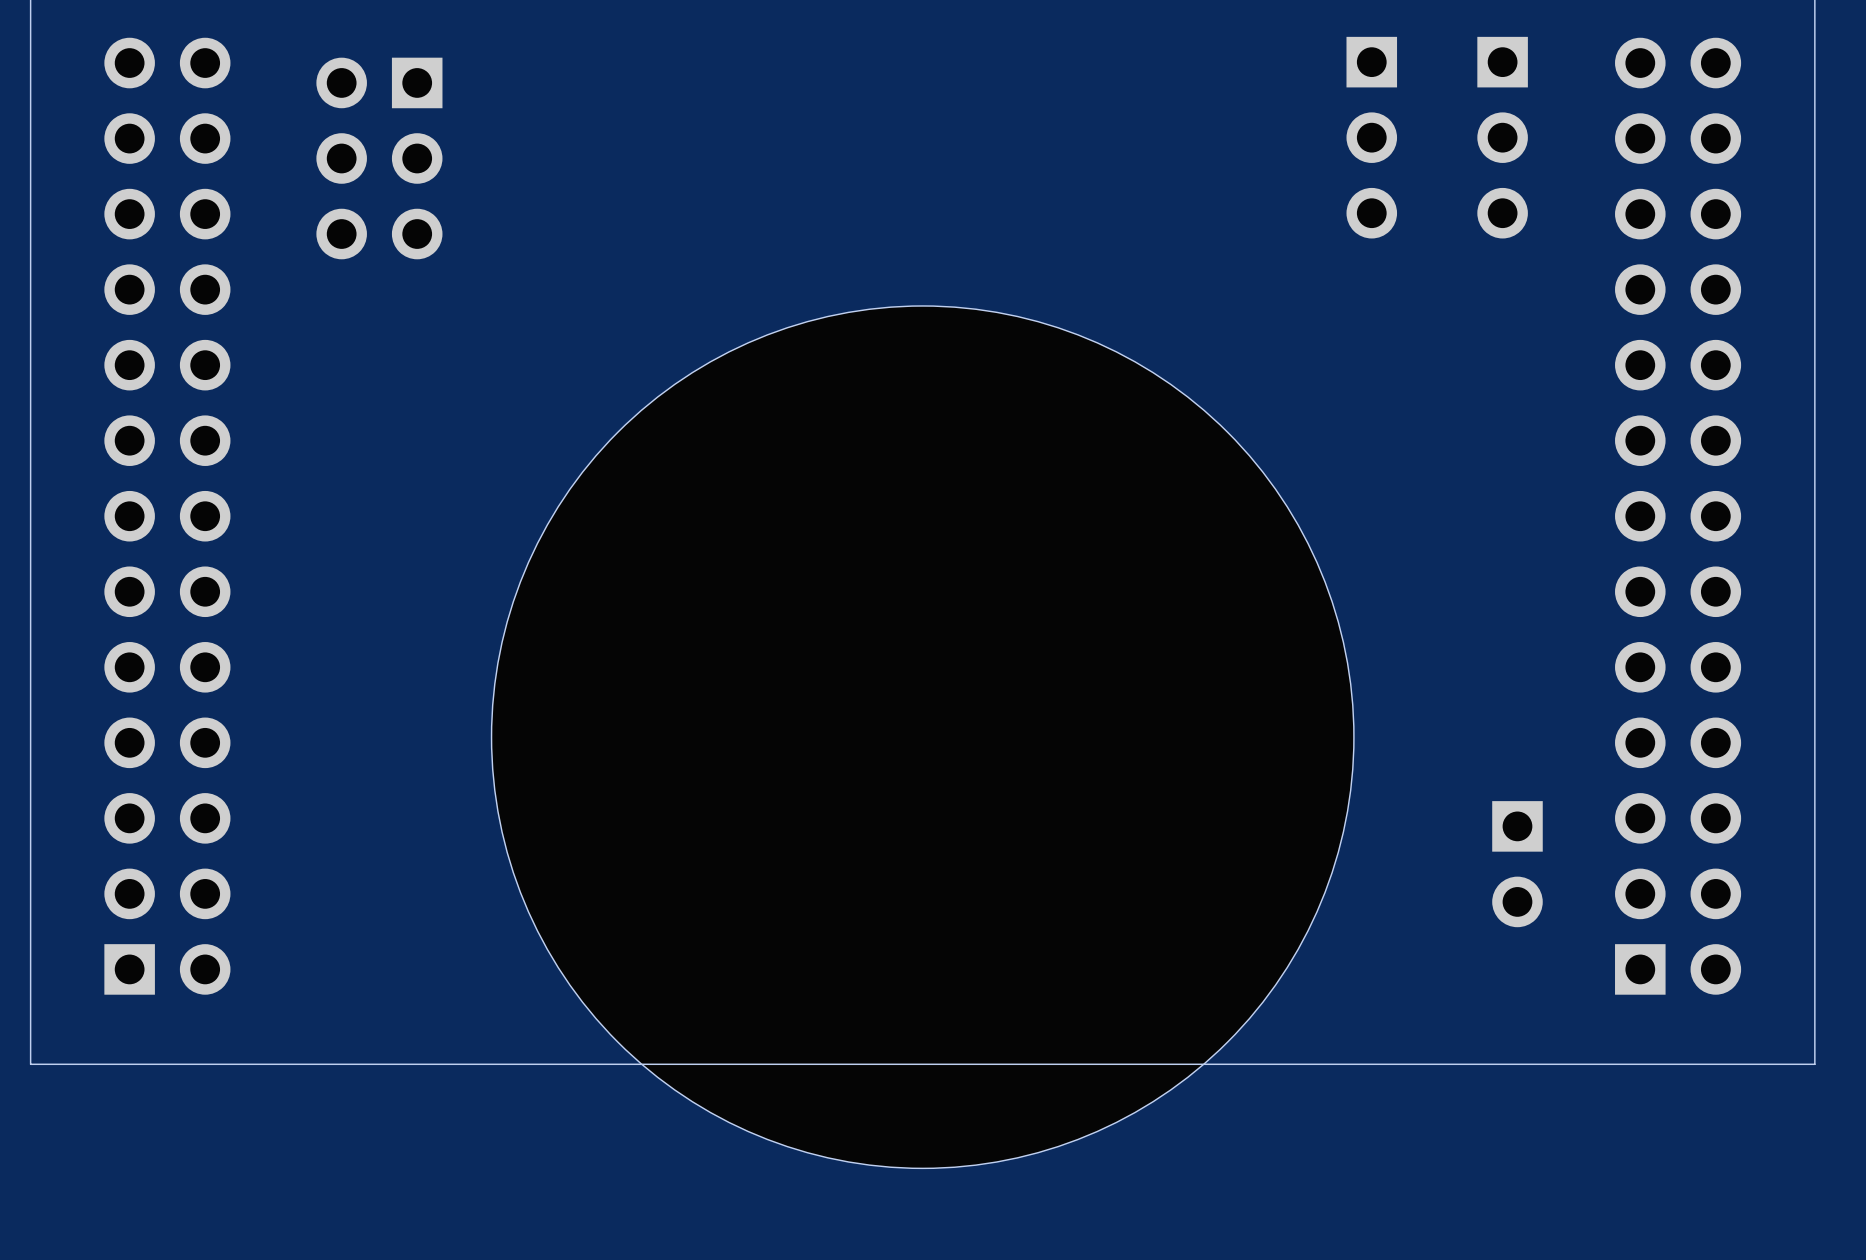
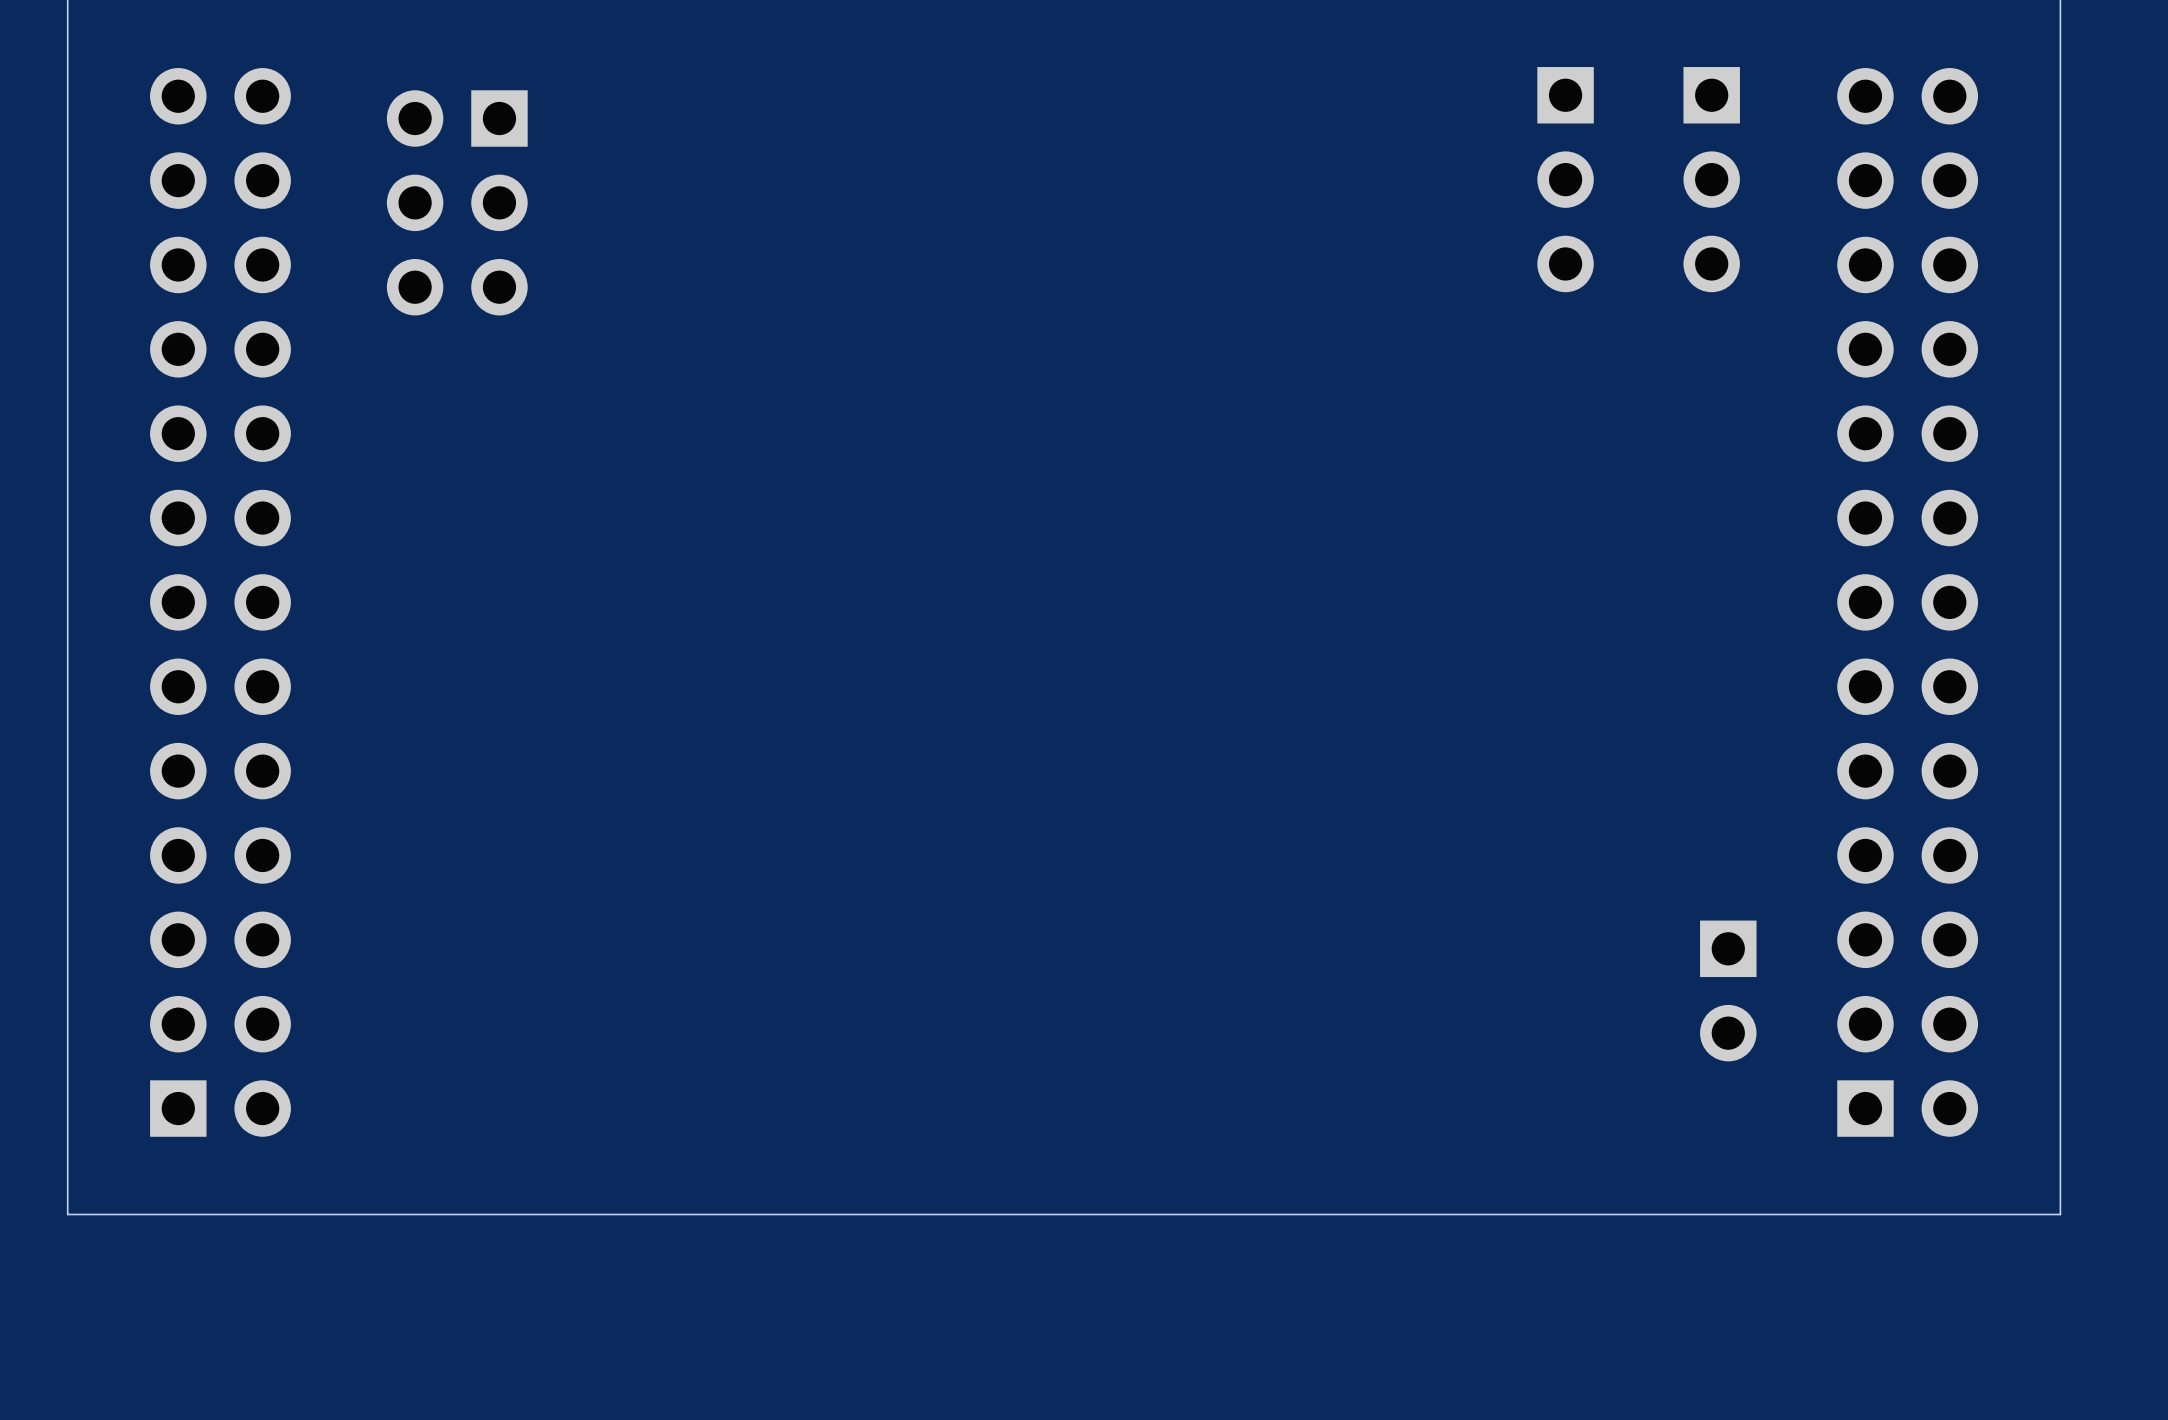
part: (922, 737) -> none

